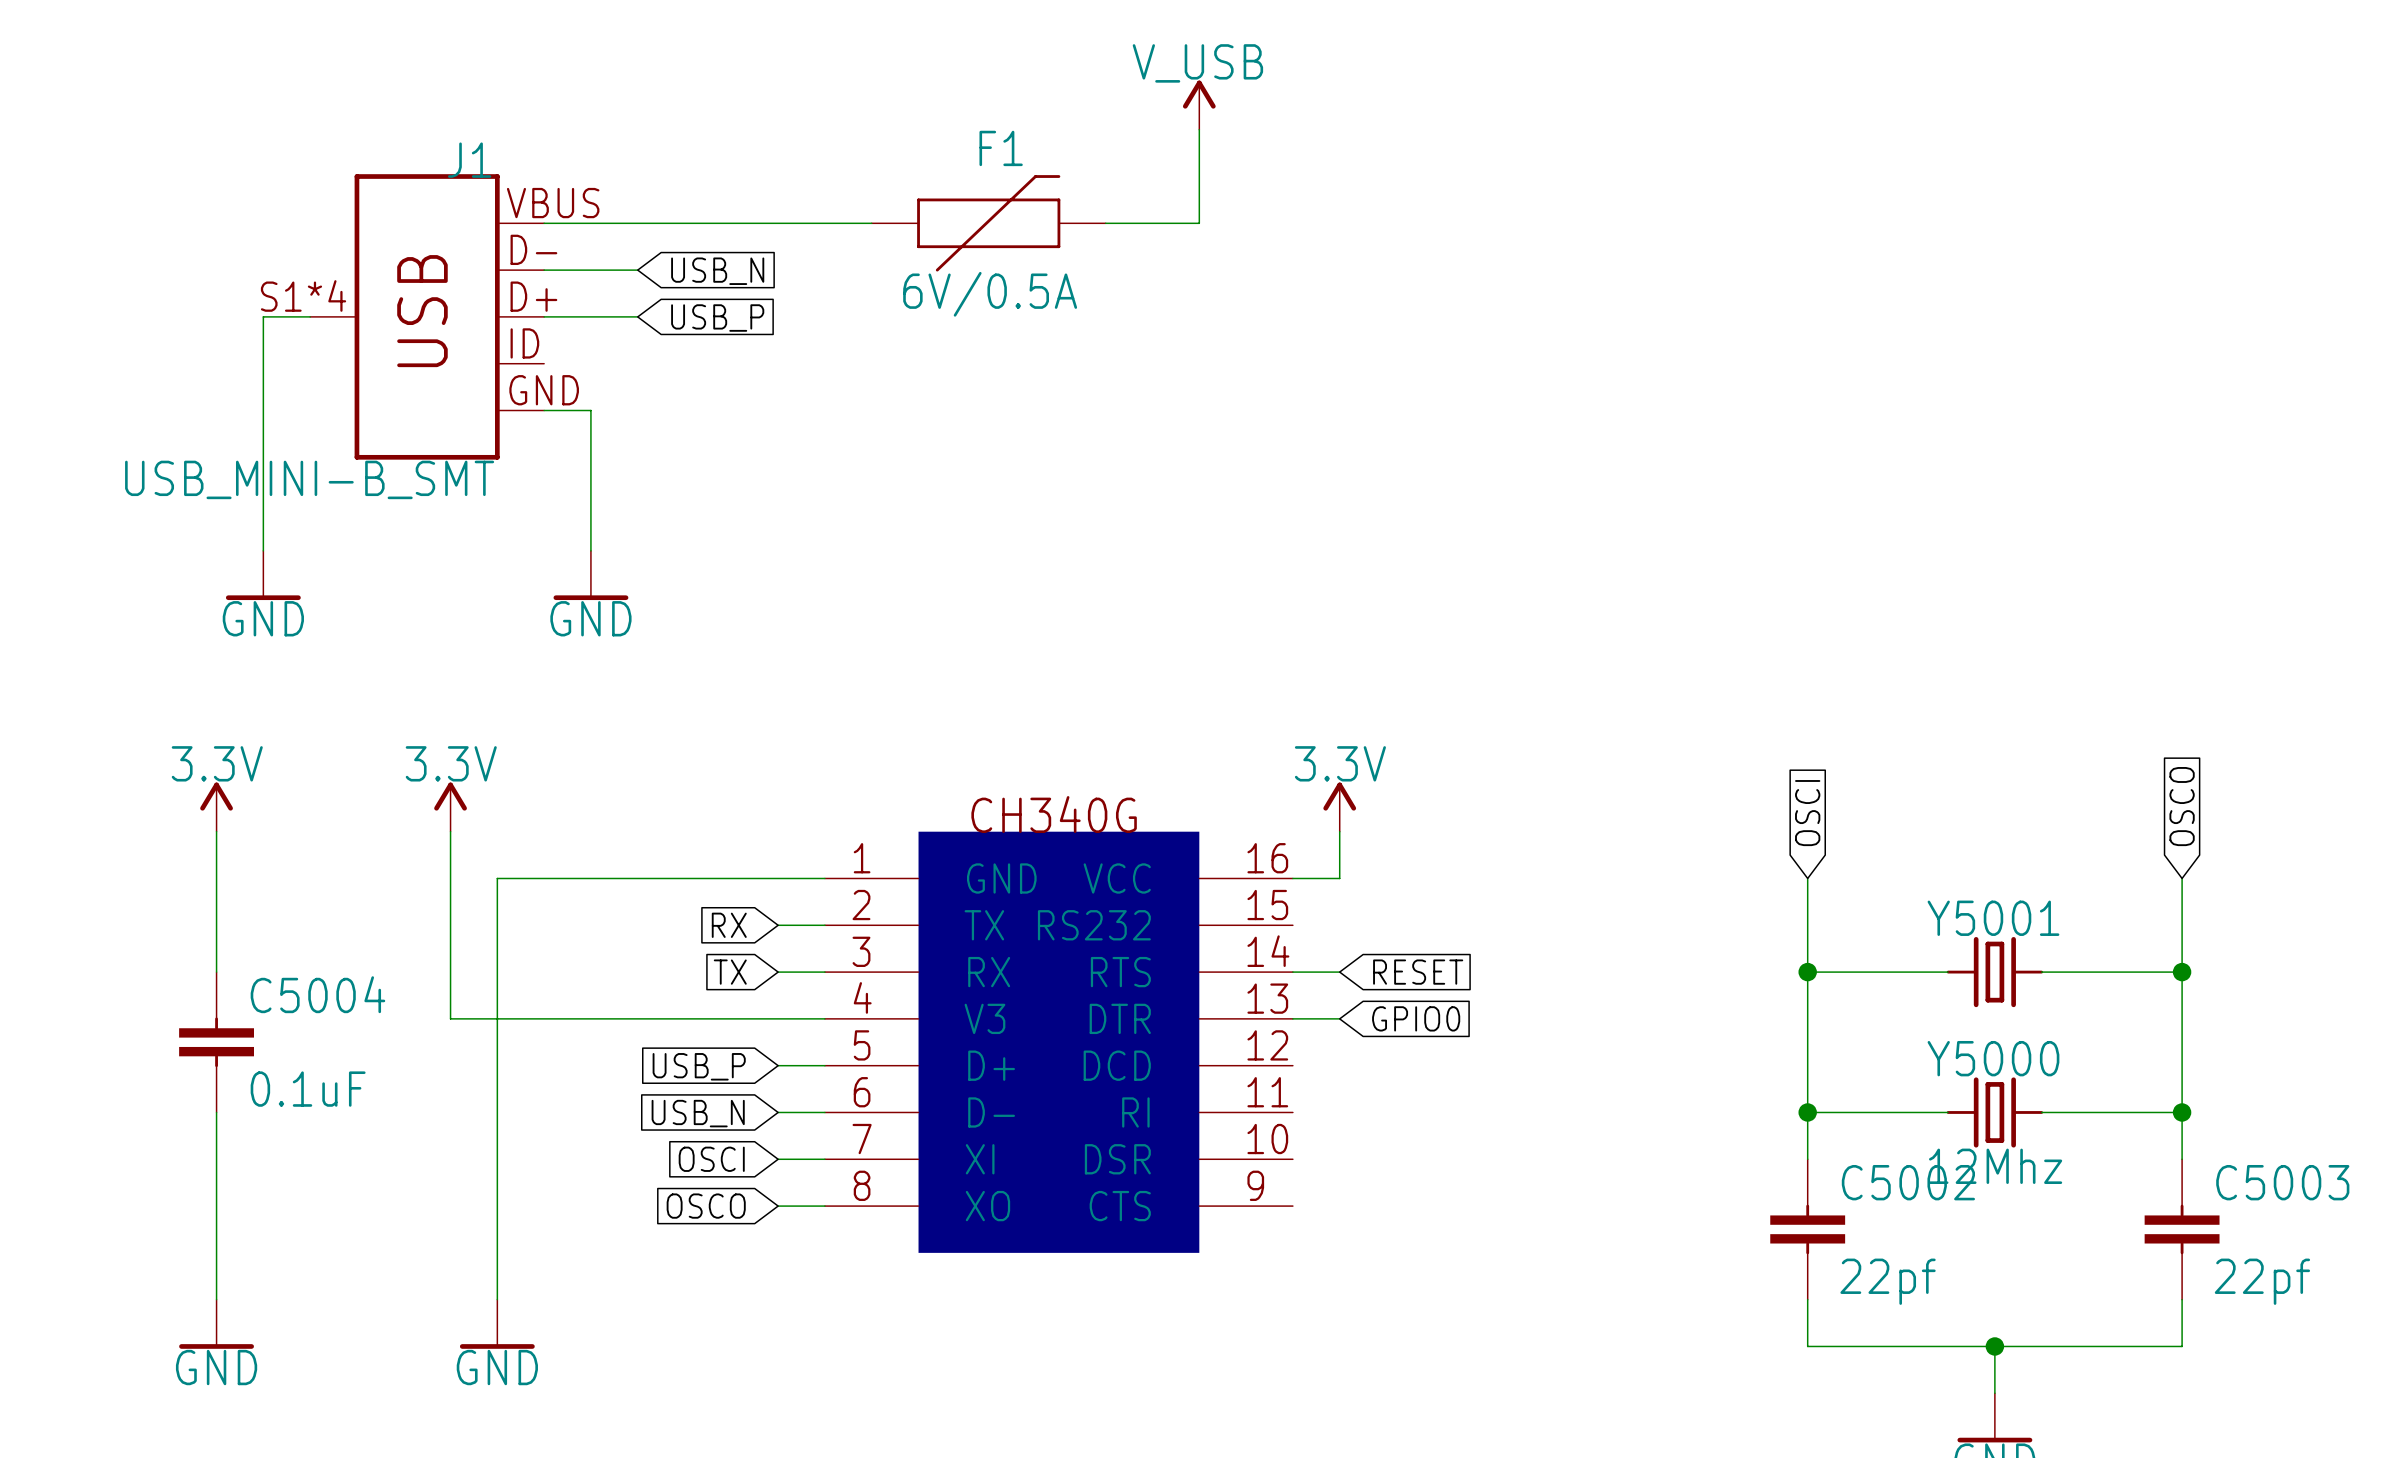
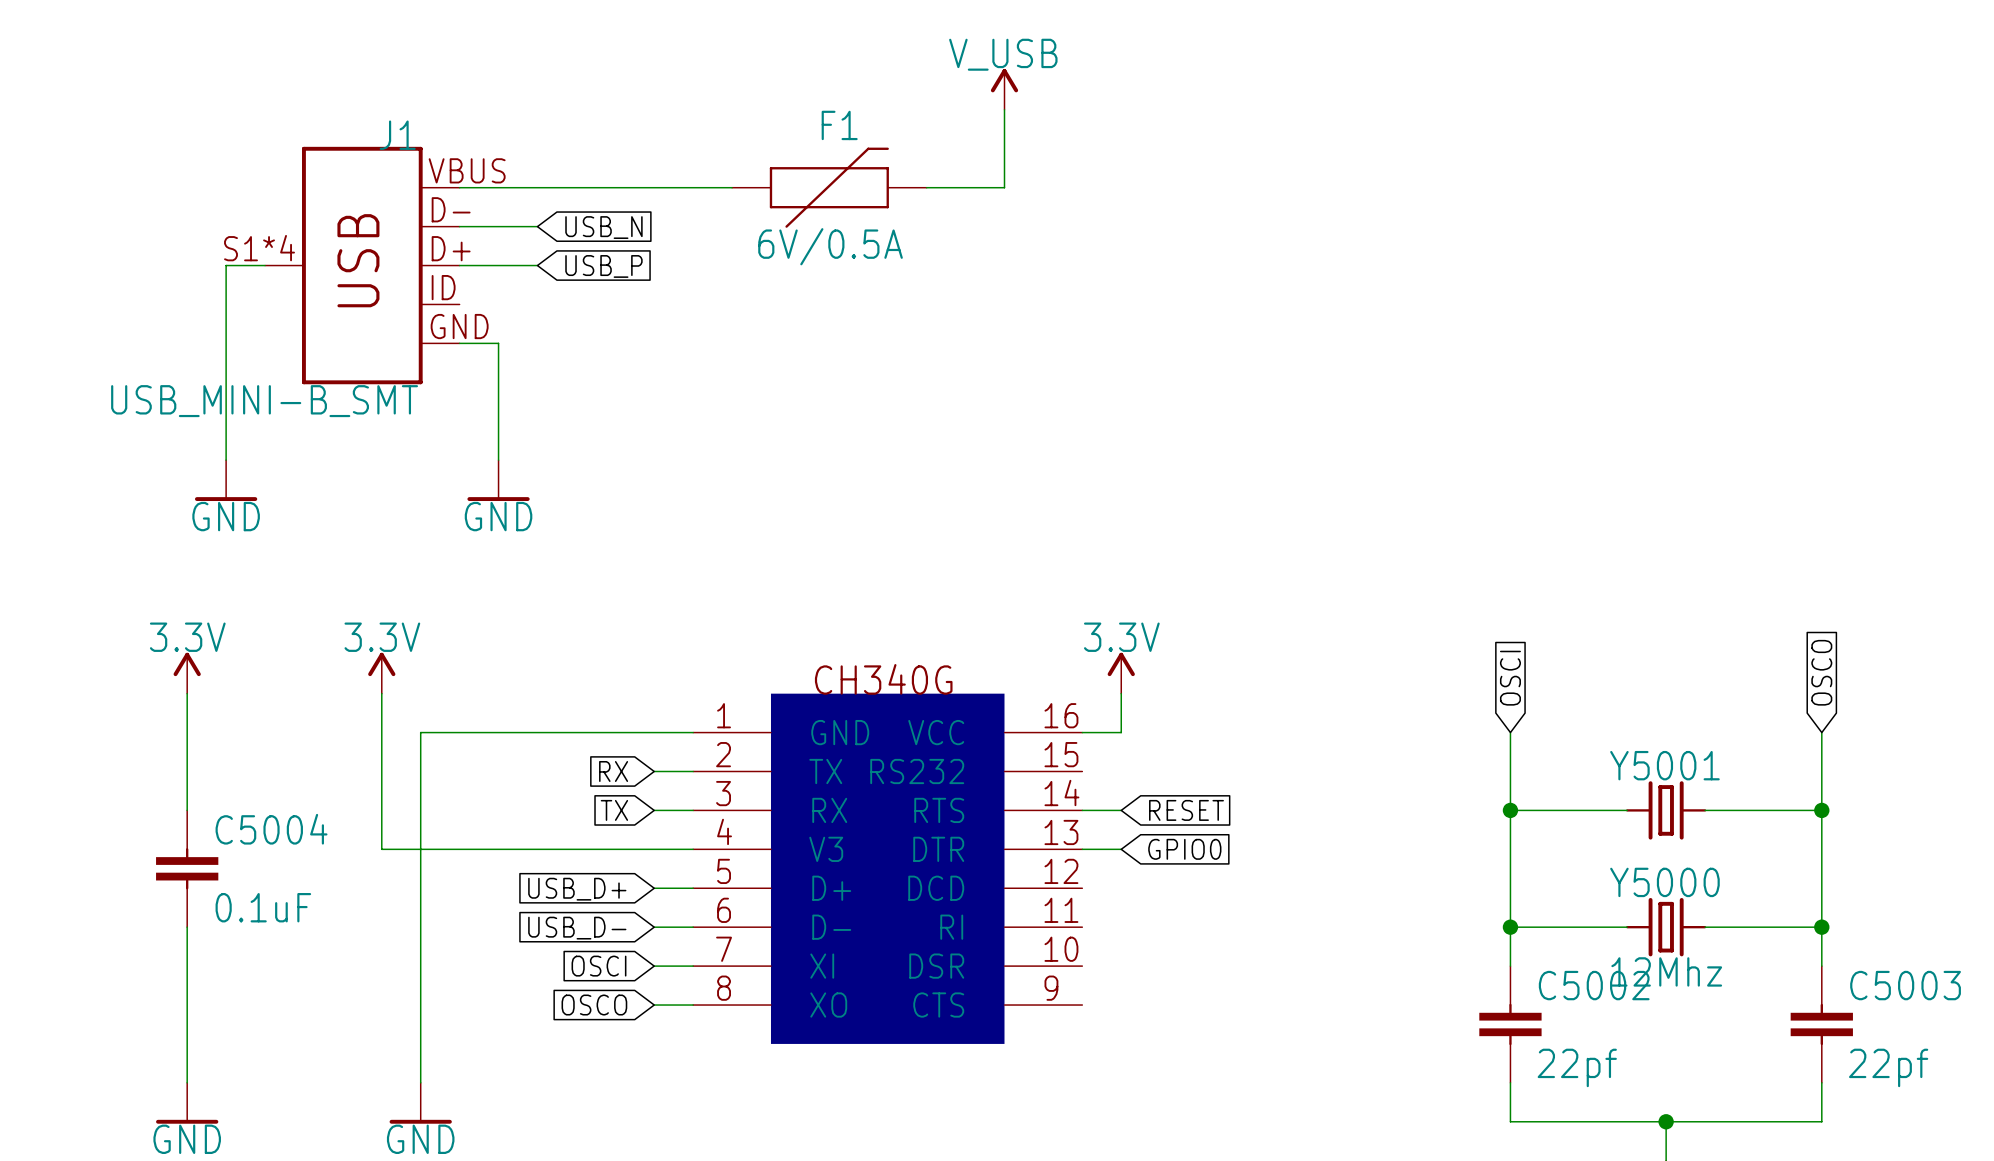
global label: USB_P (699, 1066) -> USB_D+ (577, 889)
global label: USB_N (698, 1113) -> USB_D- (577, 928)

